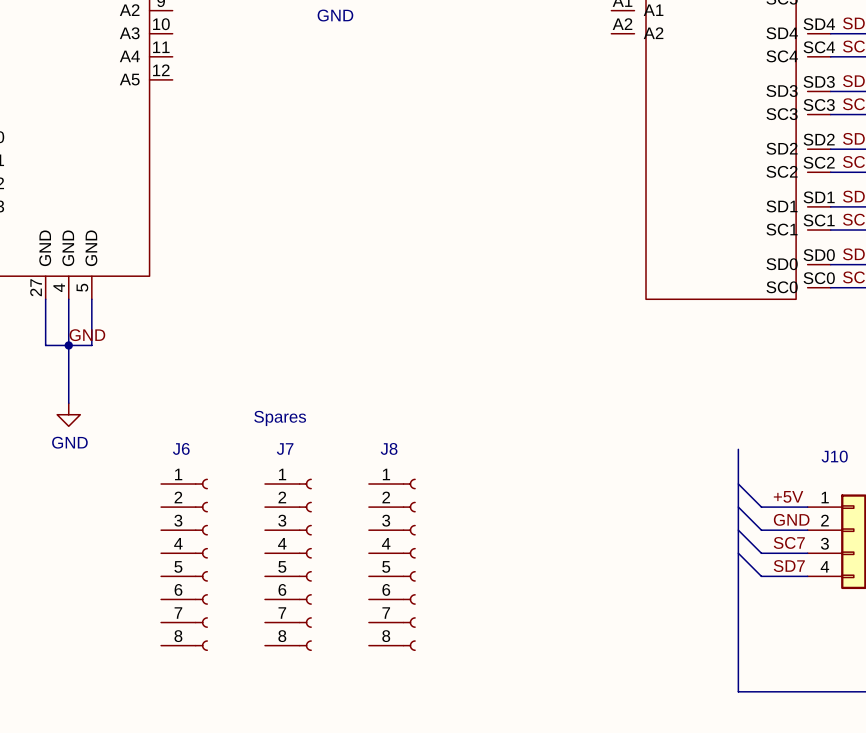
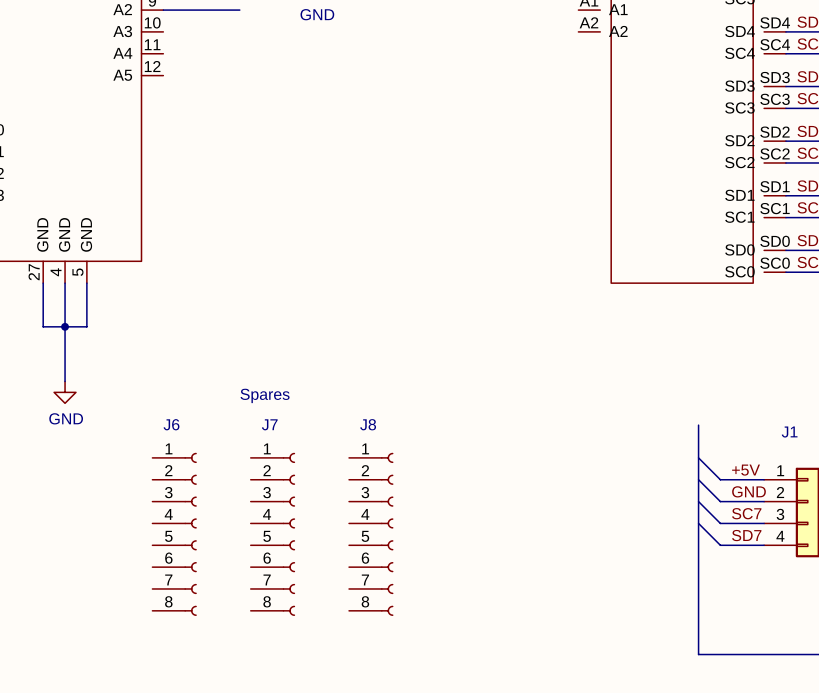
wire: none -> (163, 10) (239, 10)
label: GND (87, 335) -> none
J10 name: J10 (834, 456) -> J1 (789, 432)

